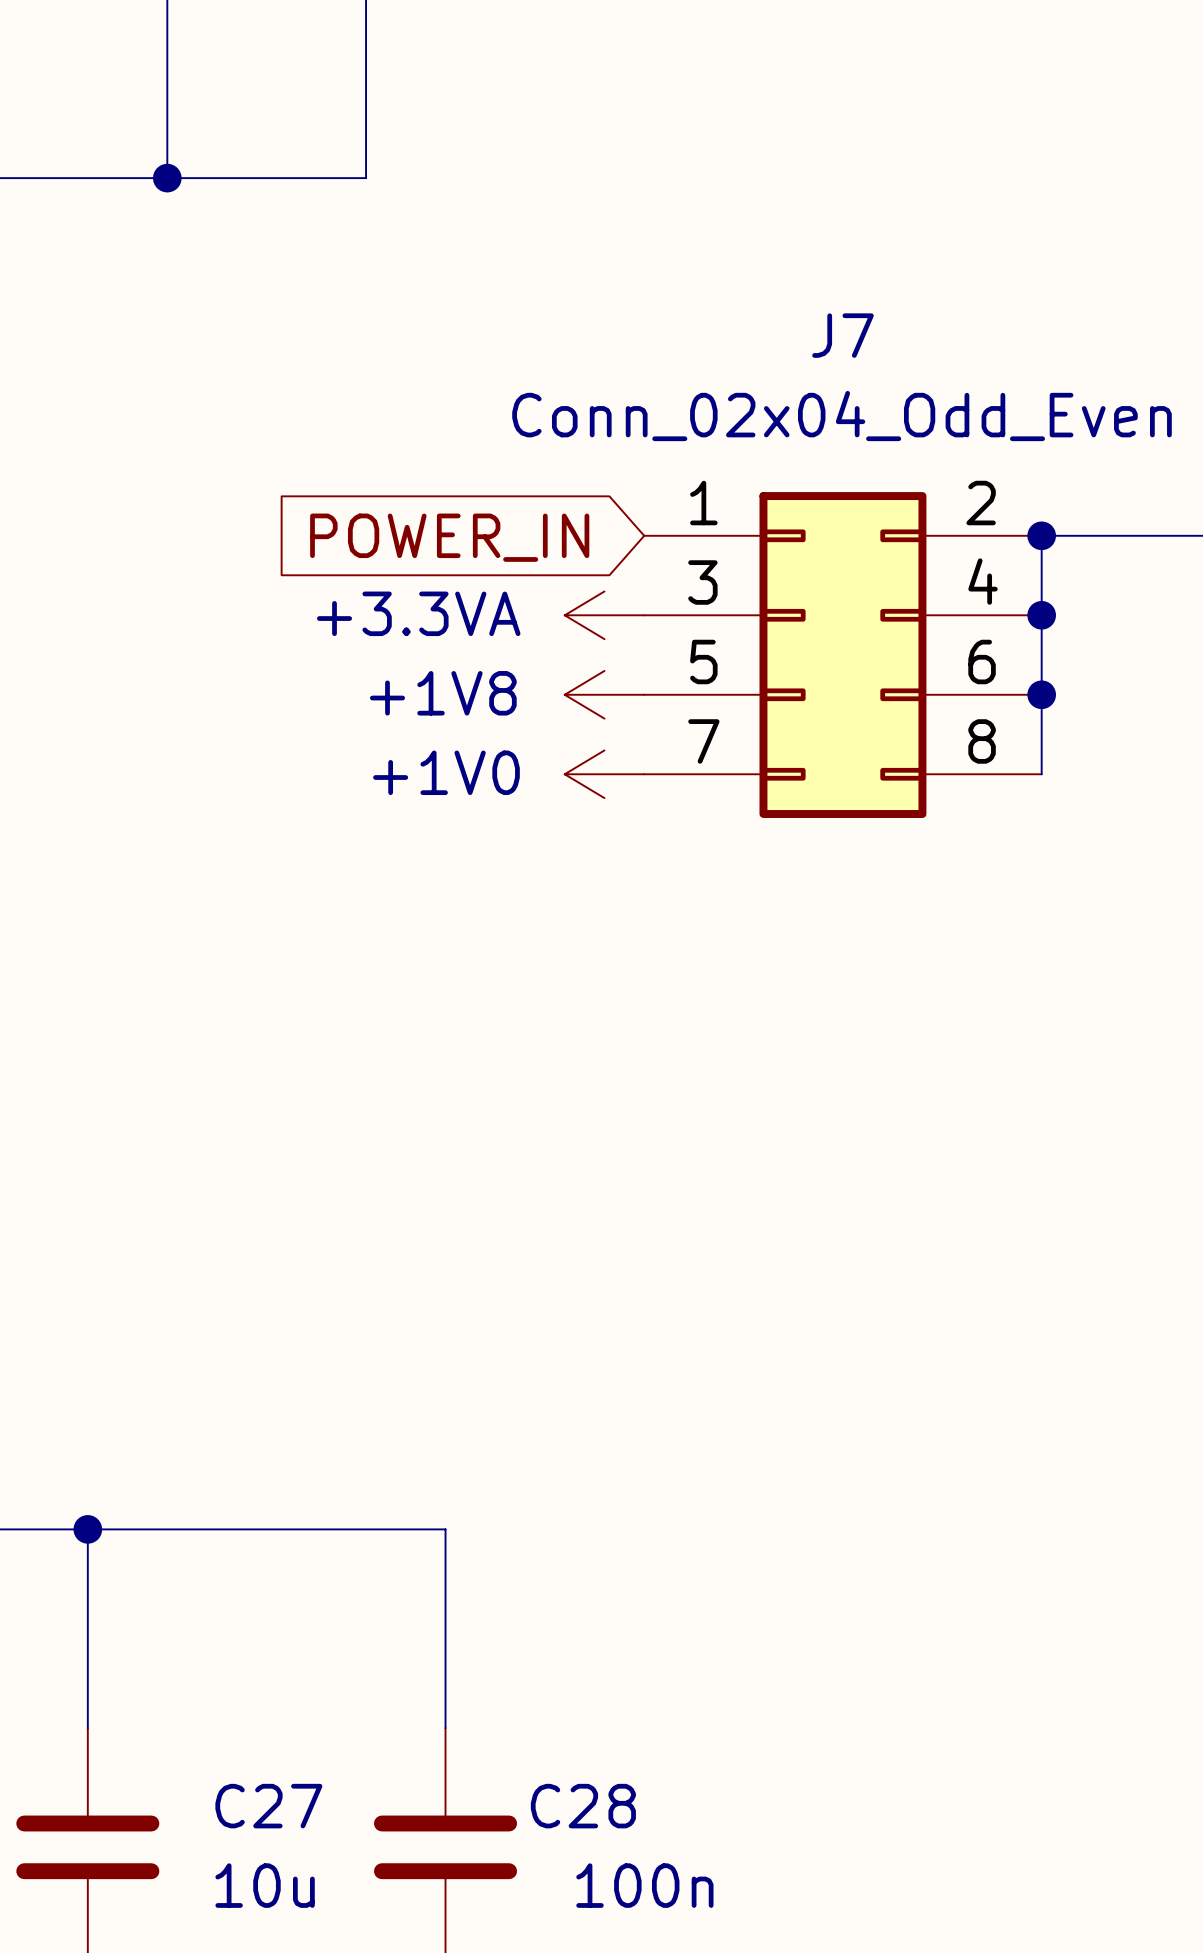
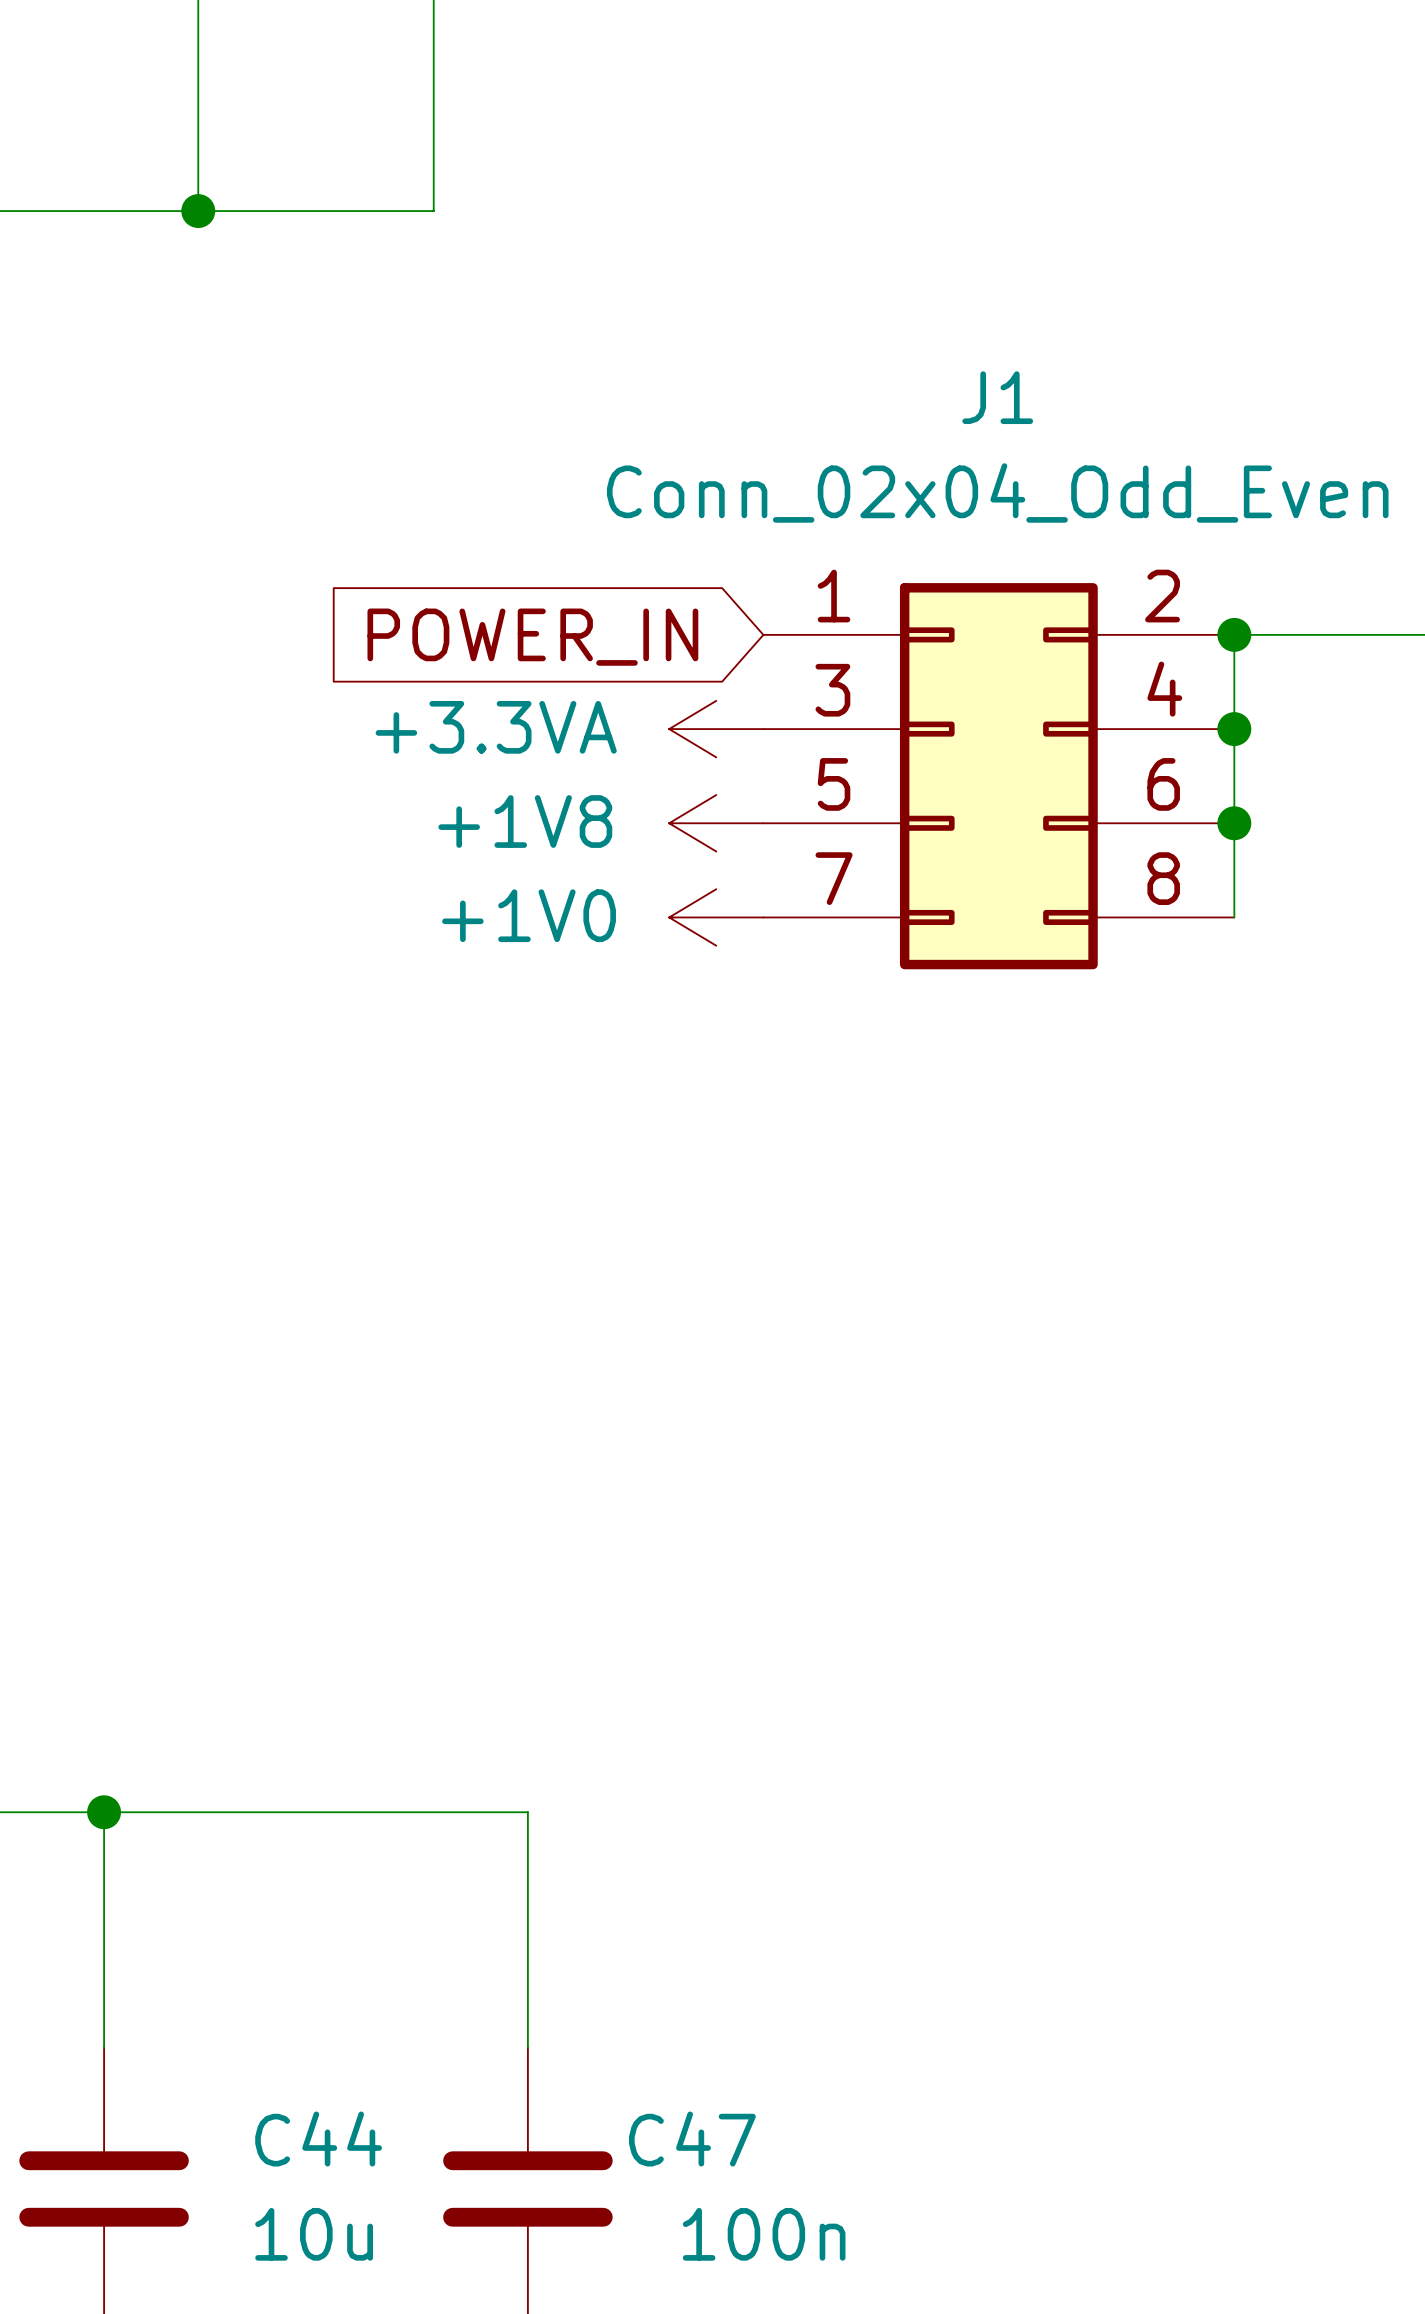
J7 name: J7 (842, 335) -> J1 (997, 397)
C27 name: C27 (268, 1806) -> C44 (318, 2139)
C28 name: C28 (583, 1806) -> C47 (692, 2139)

